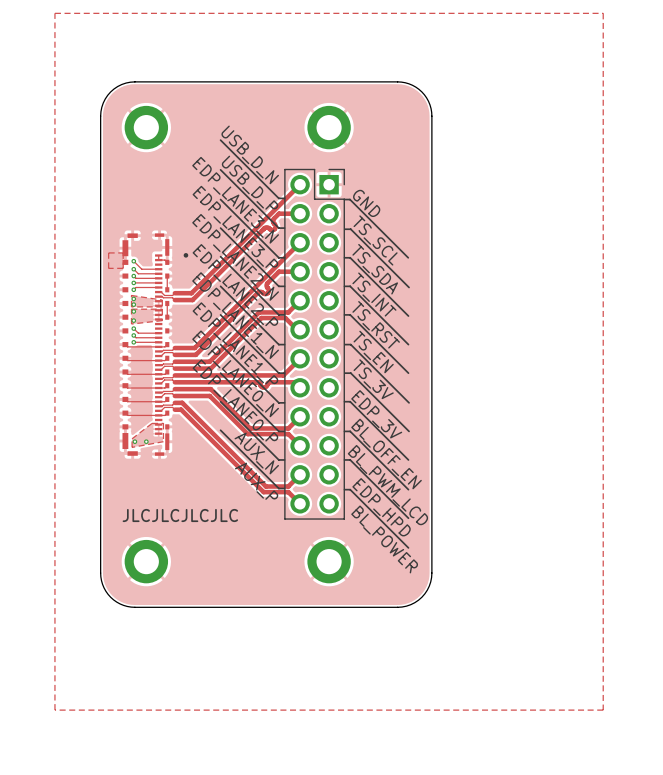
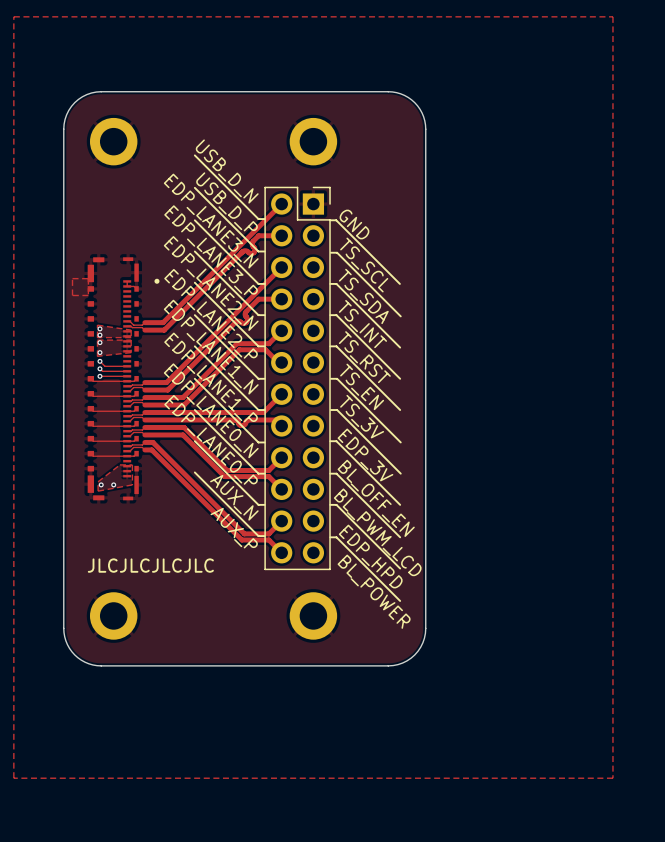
track: (133, 261) (141, 269) (158, 269) -> none
via: (133, 261) -> none
track: (133, 269) (138, 273) (158, 273) -> none
via: (133, 269) -> none
track: (133, 276) (136, 278) (158, 278) -> none
via: (133, 276) -> none
track: (167, 276) (167, 289) -> none
track: (133, 282) (158, 282) -> none
via: (133, 282) -> none
track: (158, 287) (136, 287) (133, 289) -> none
via: (133, 289) -> none
track: (167, 303) (167, 317) -> none

